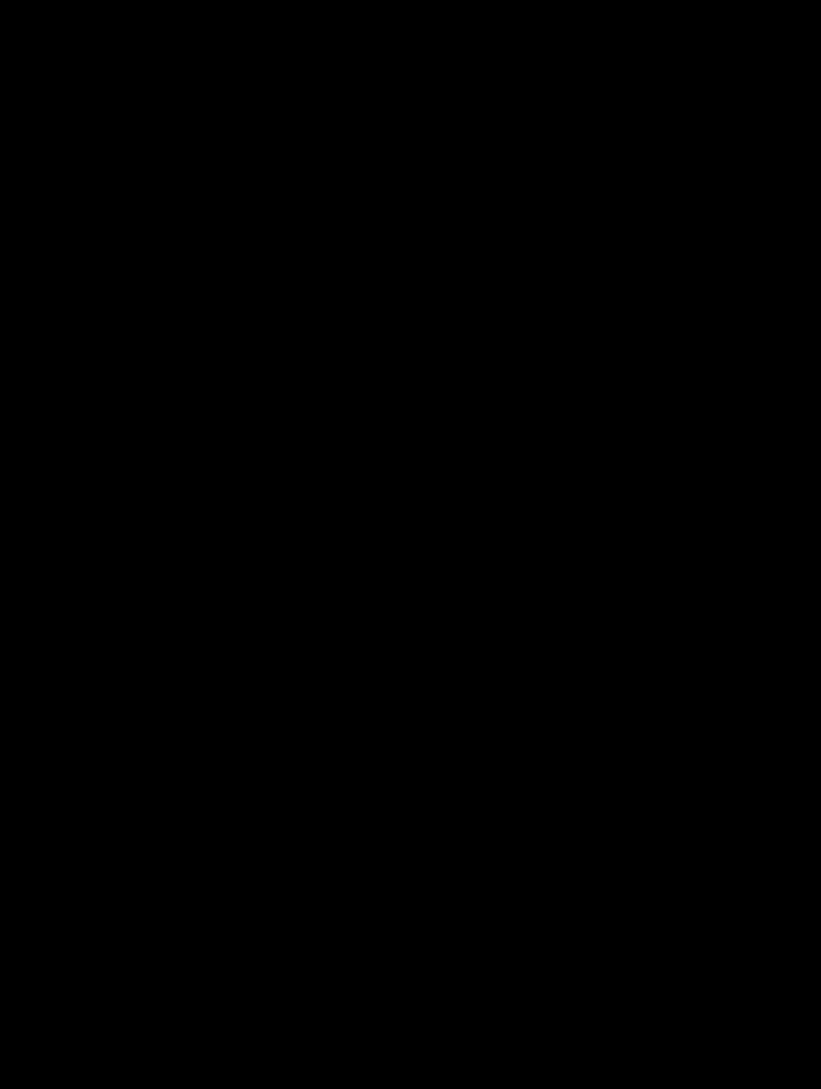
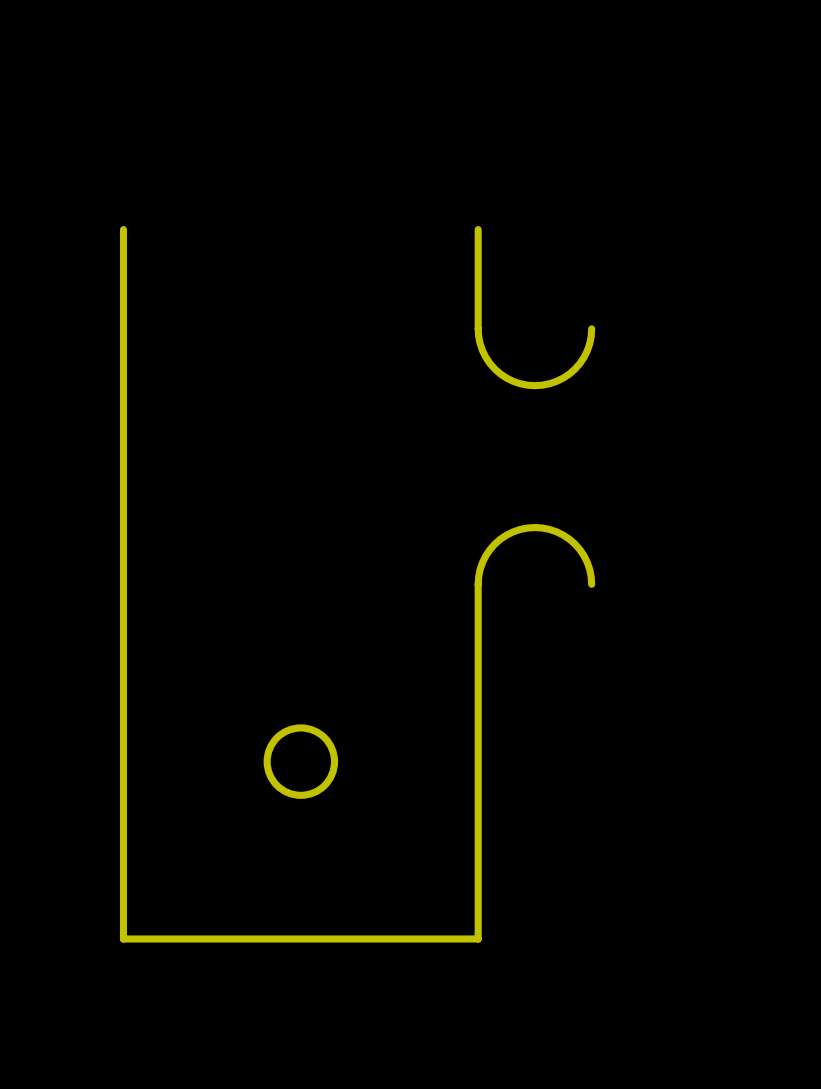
board edge: none -> (123, 229) (123, 938) (478, 938) (478, 584) (480, 569) (489, 549) (500, 539) (520, 529) (542, 528) (563, 535) (575, 544) (587, 562) (591, 584)
board edge: none -> (478, 229) (478, 336) (485, 357) (500, 373) (513, 381) (527, 385) (542, 385) (556, 381) (569, 373) (579, 363) (587, 350) (591, 328)
round board edge: none -> [263, 724, 339, 799]

